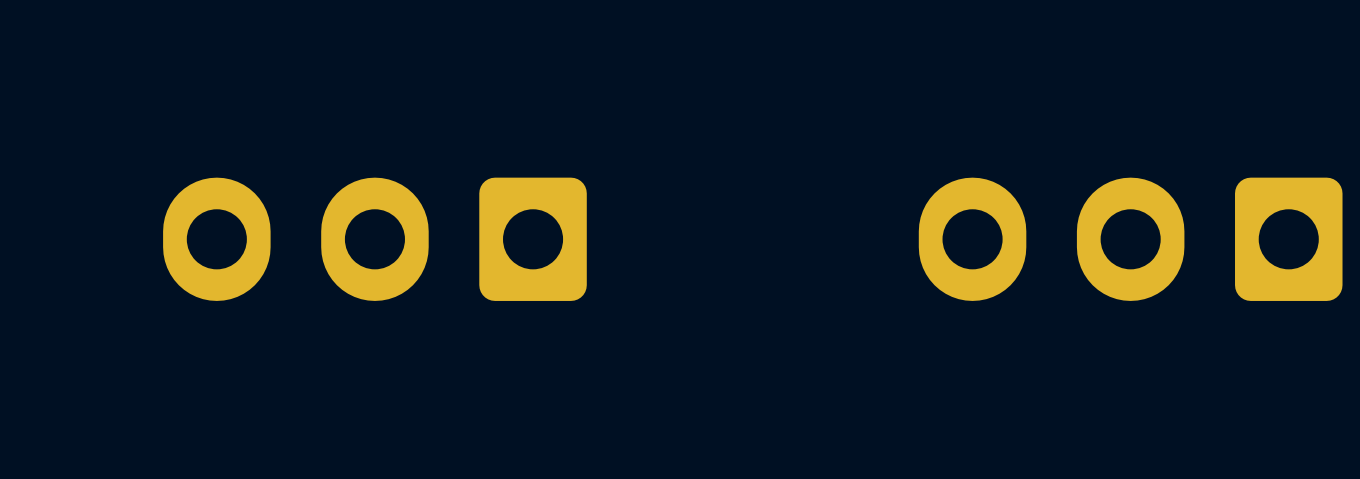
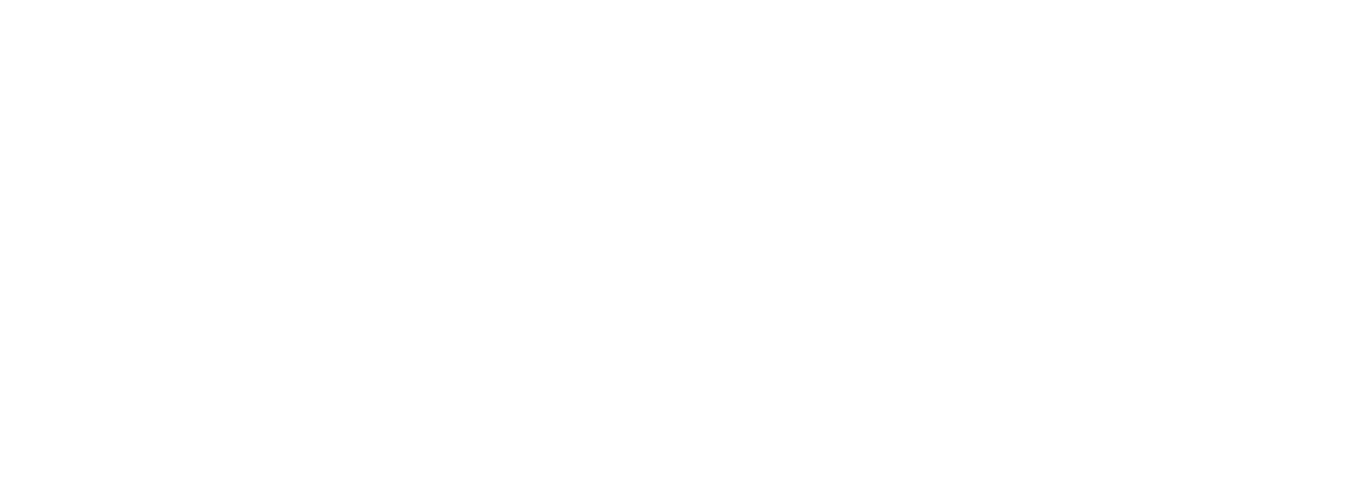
part: (374, 239) -> none
part: (1130, 239) -> none

